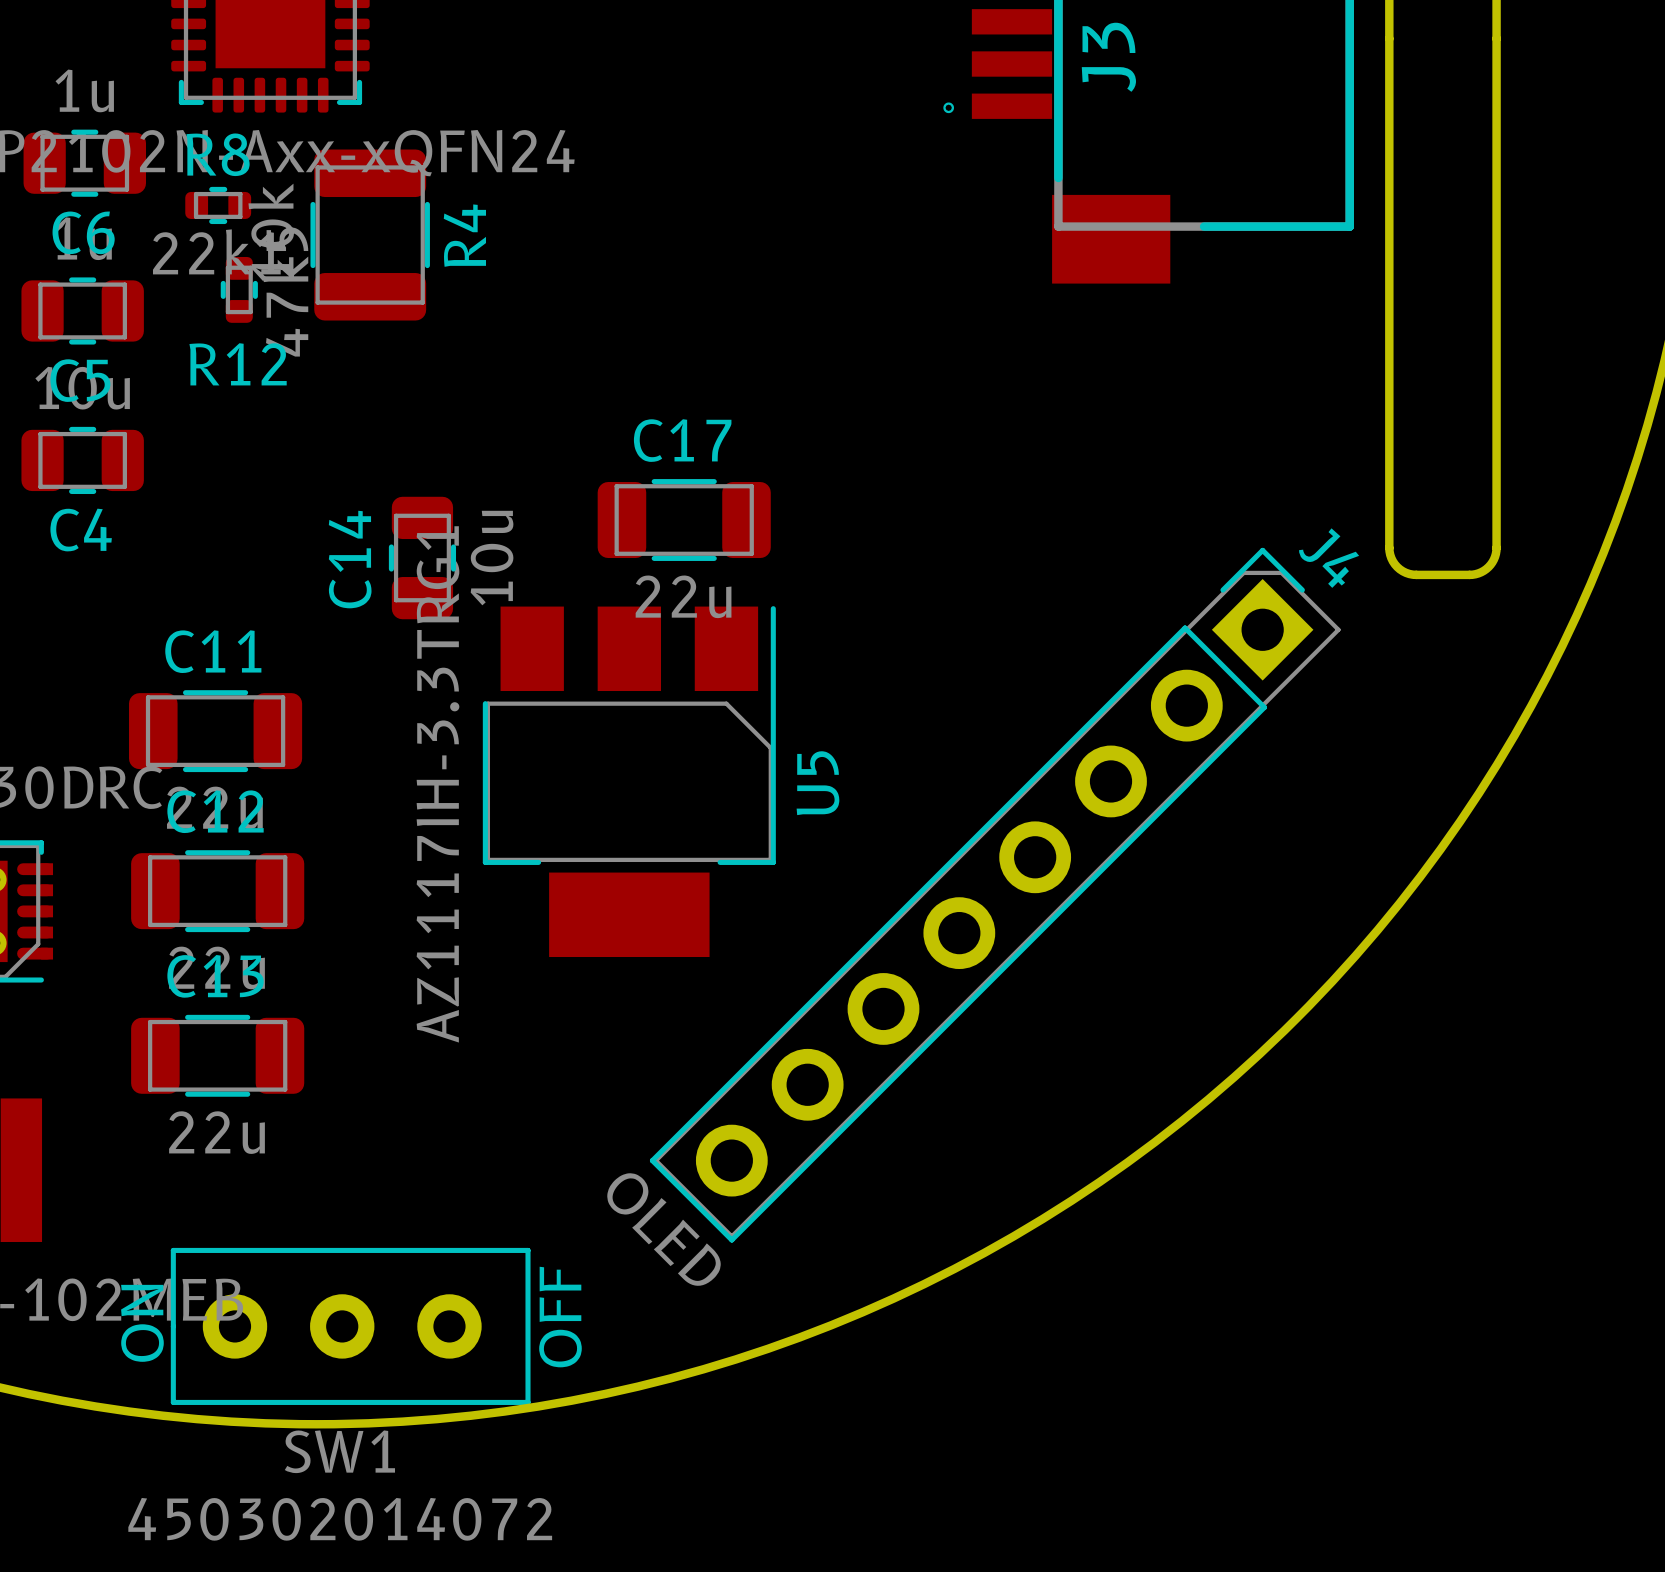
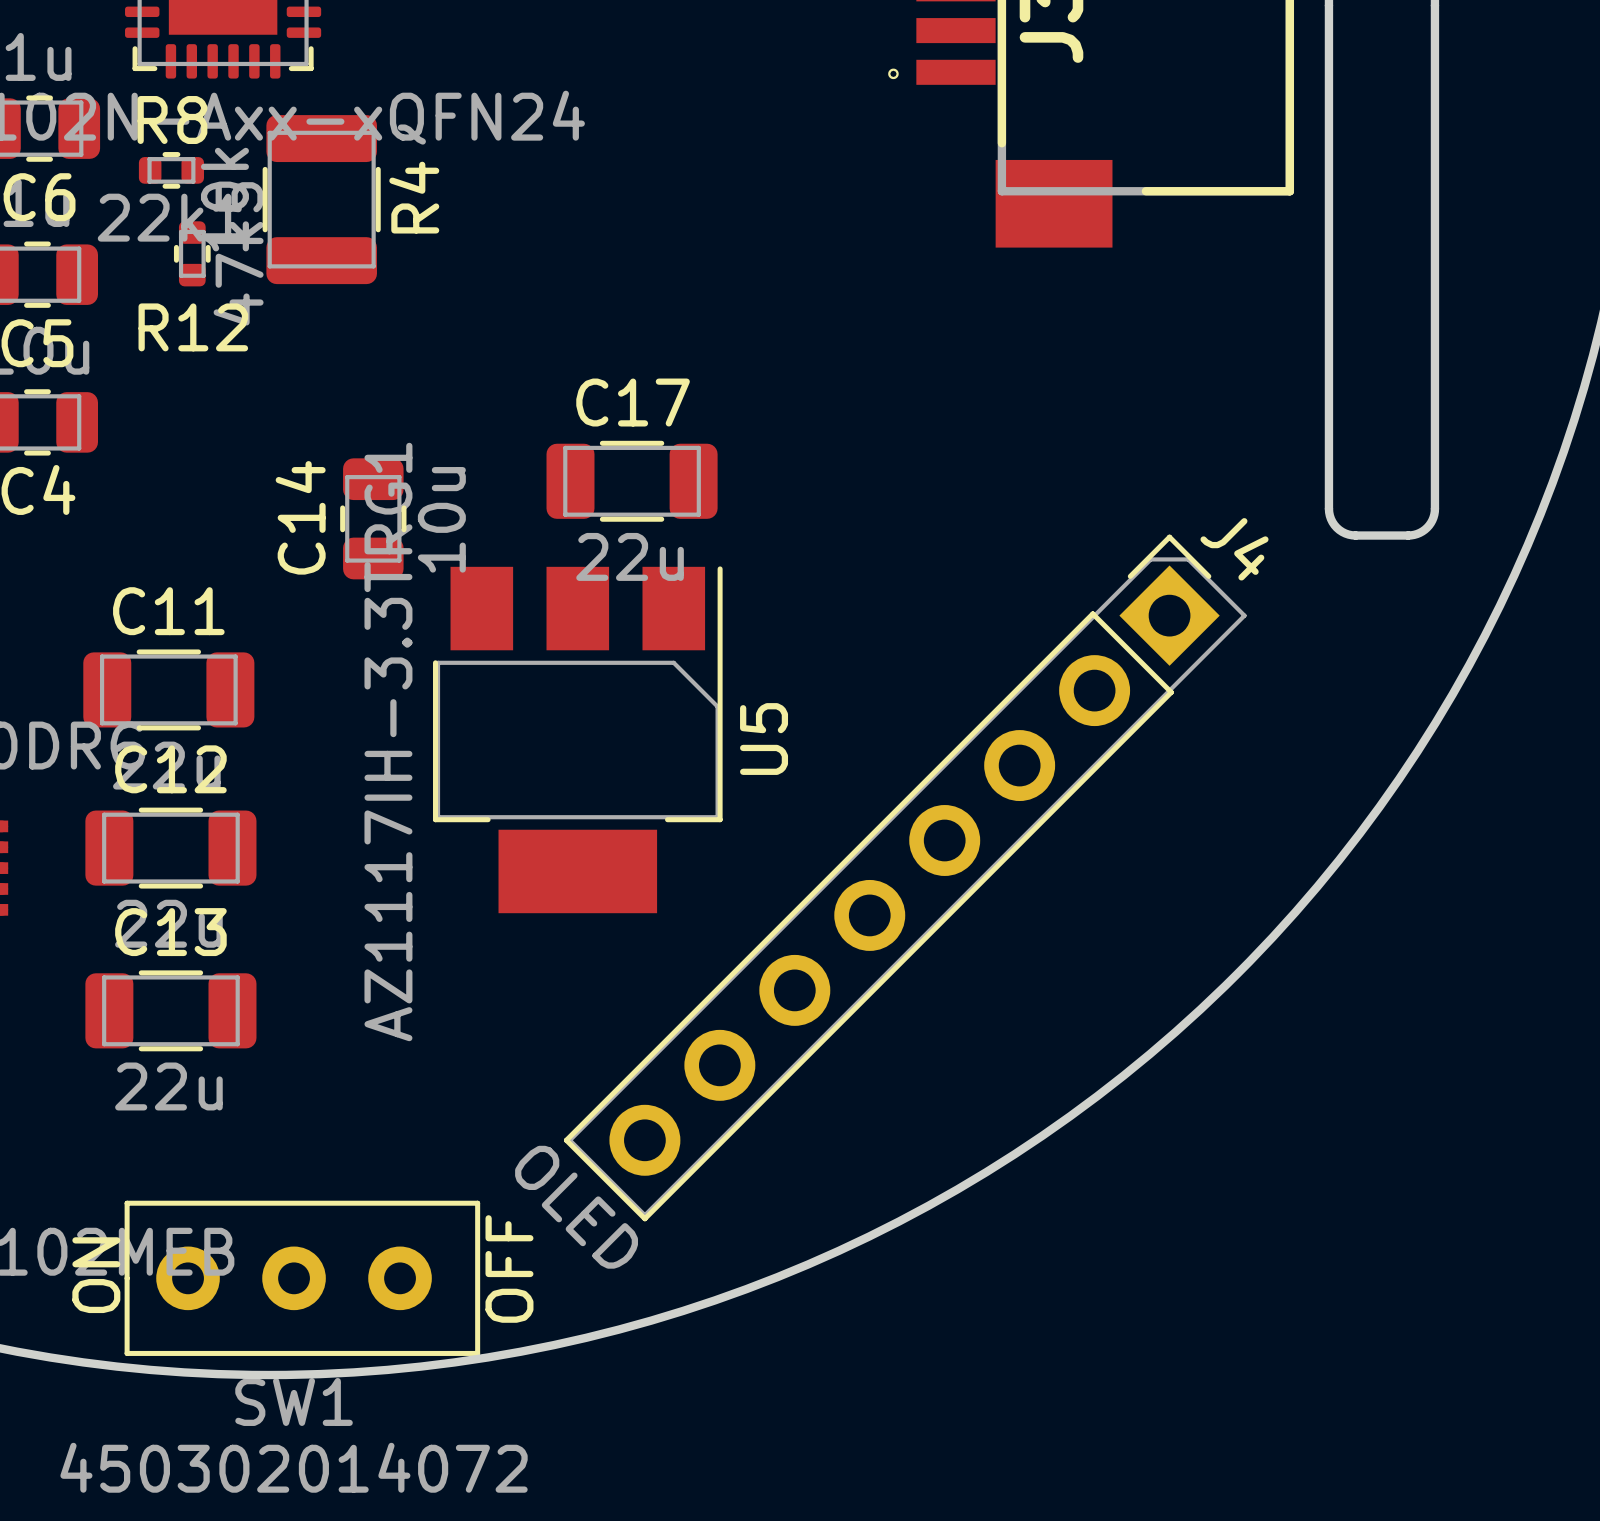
J4 position: (995, 895) -> (905, 877)

